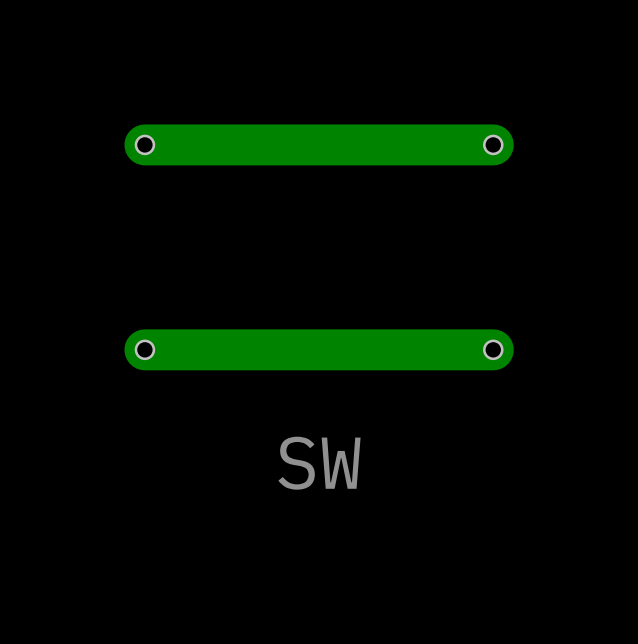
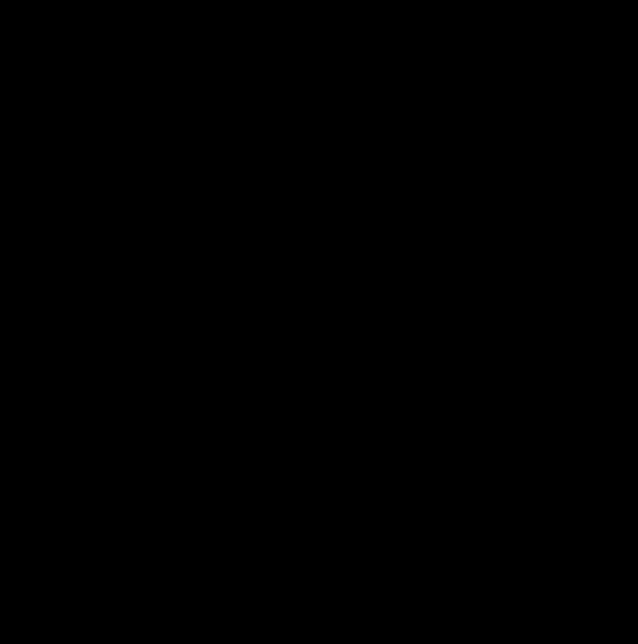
via: (144, 144) -> none
track: (493, 144) (144, 144) -> none
via: (493, 144) -> none
via: (144, 349) -> none
track: (493, 349) (144, 349) -> none
via: (493, 349) -> none
part: SW (319, 463) -> none

